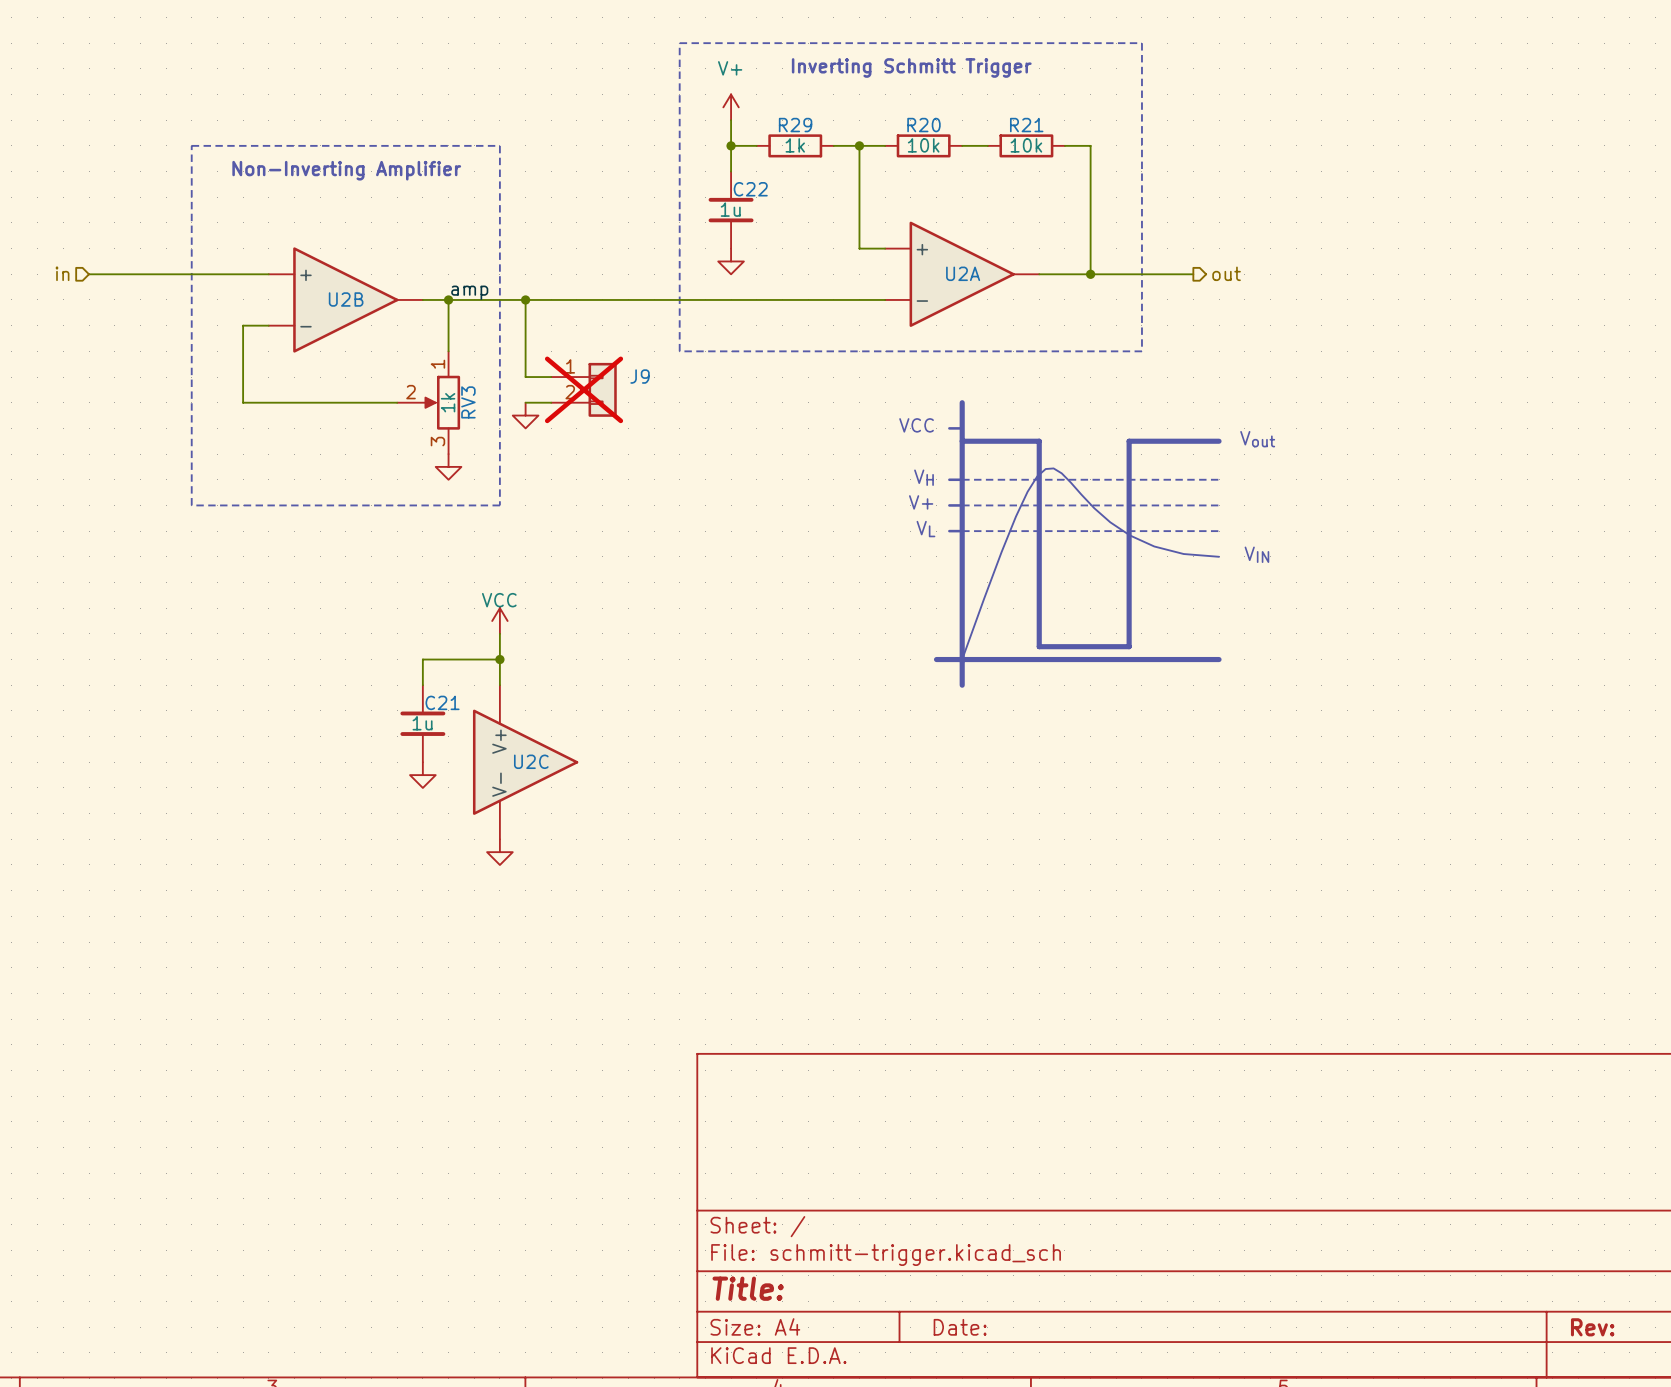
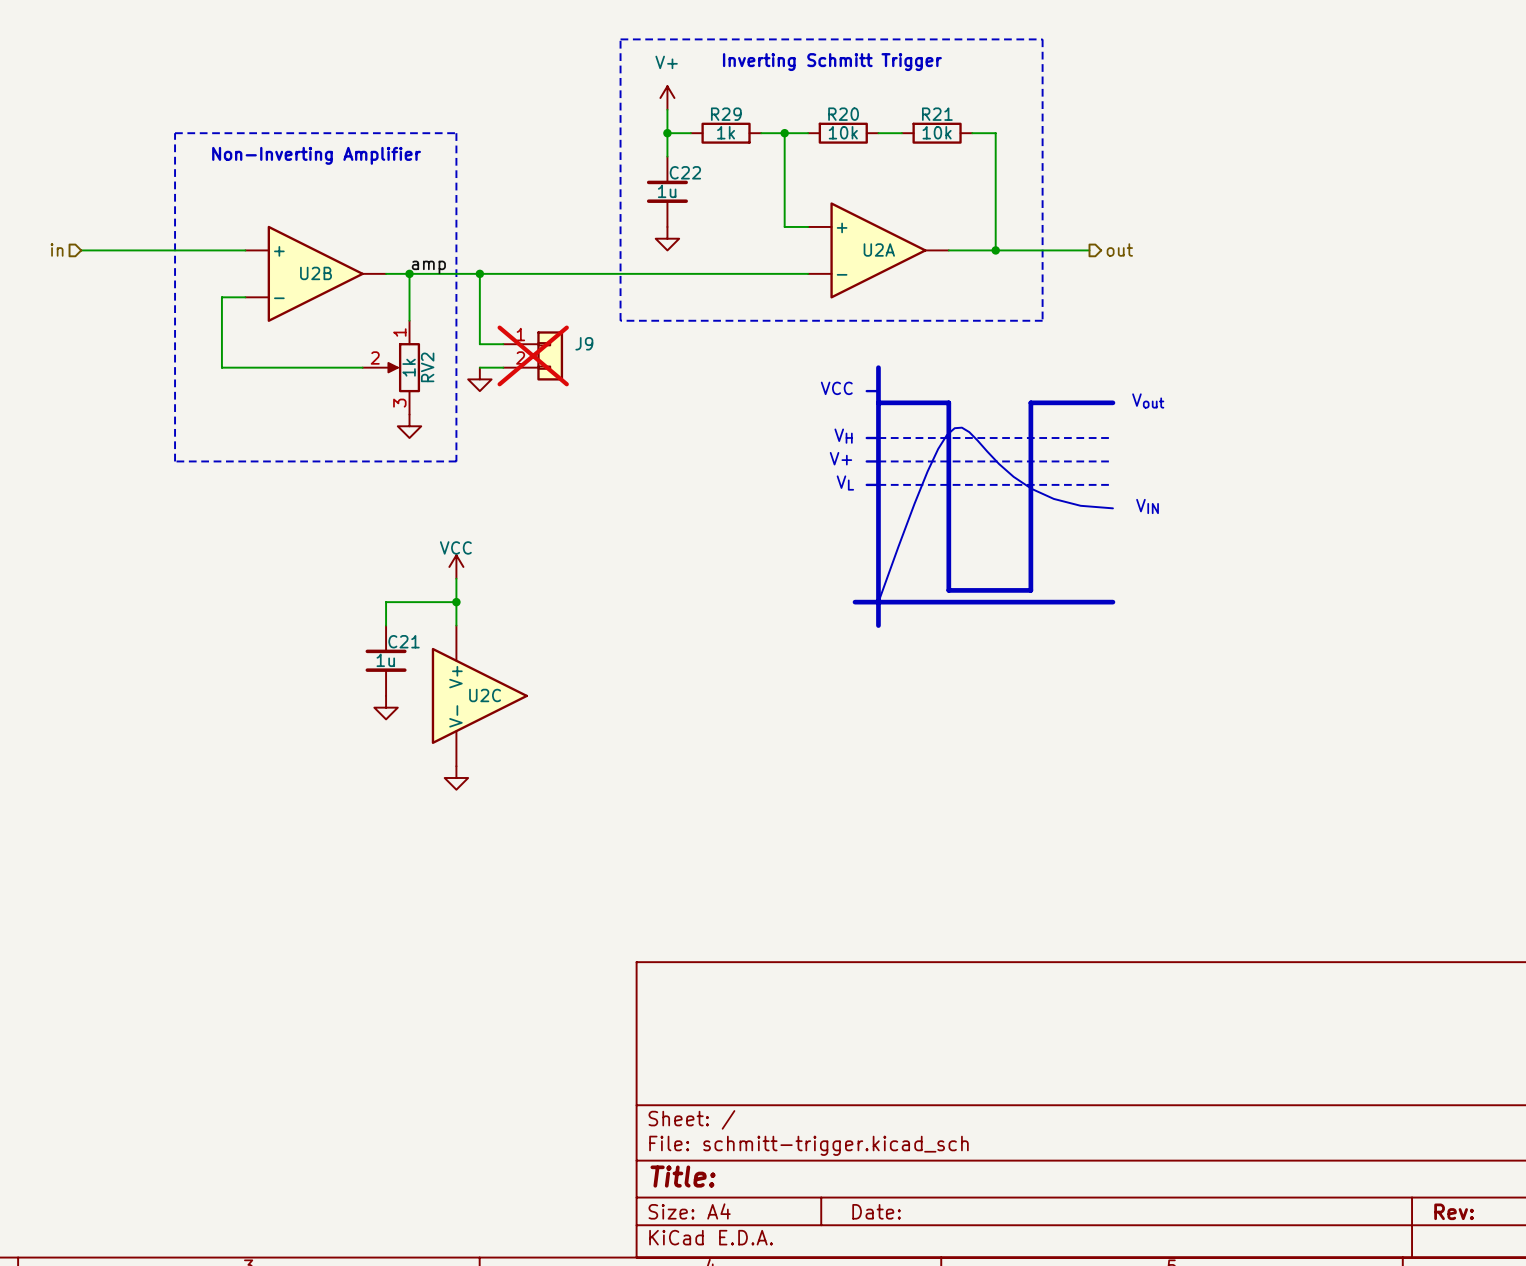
RV3 name: RV3 (468, 402) -> RV2 (427, 367)

